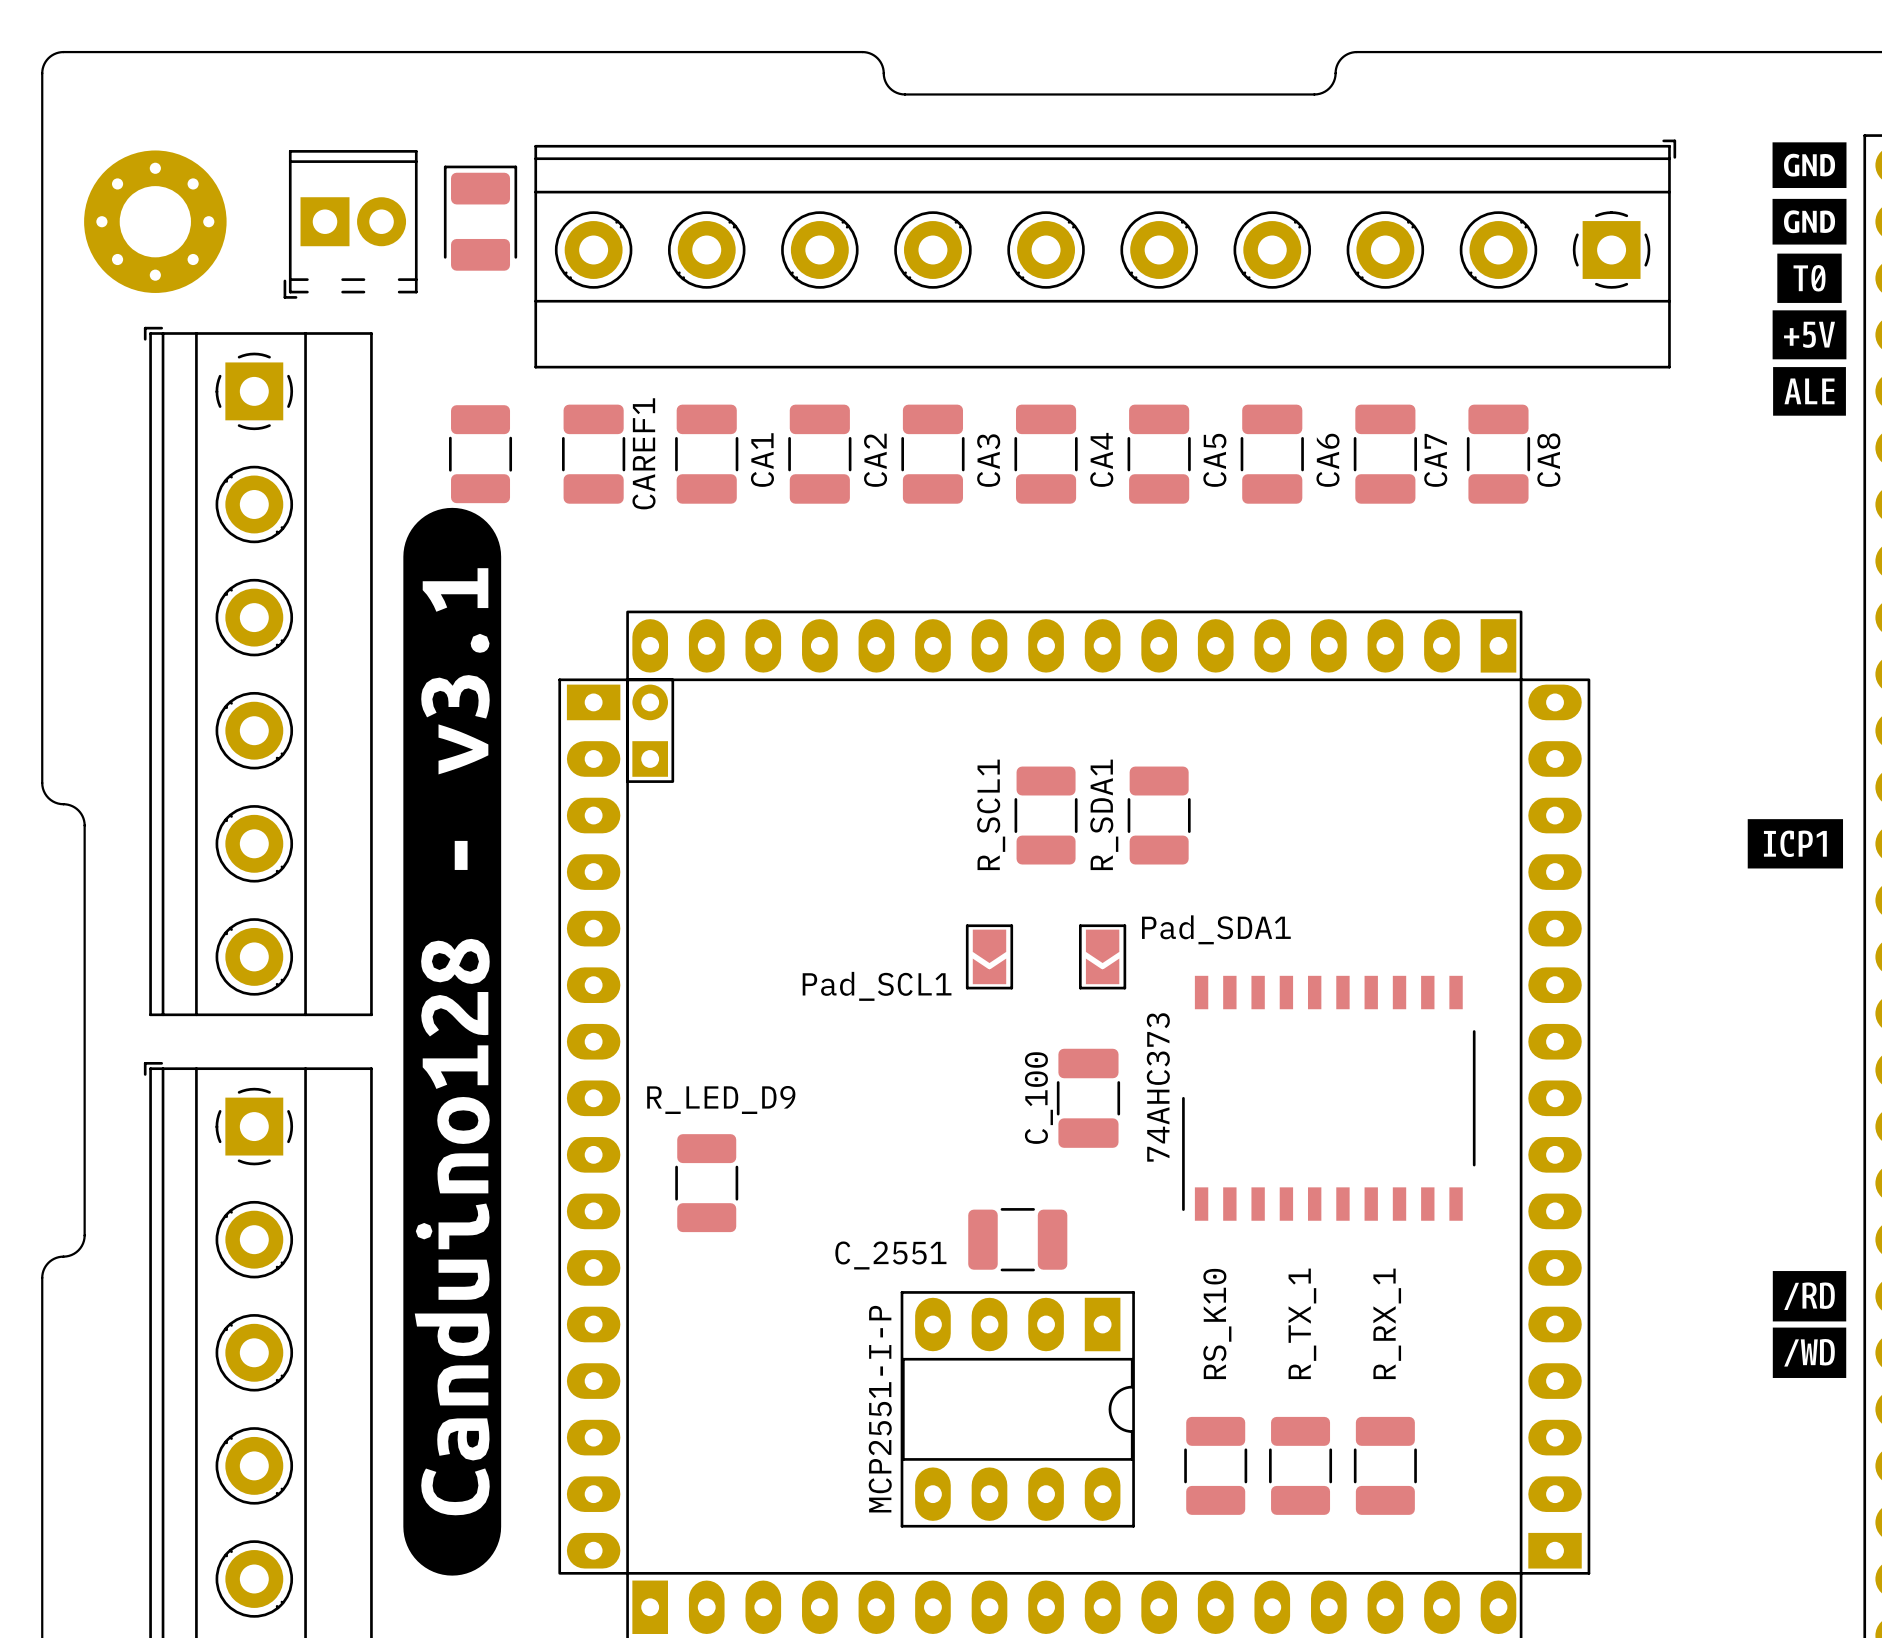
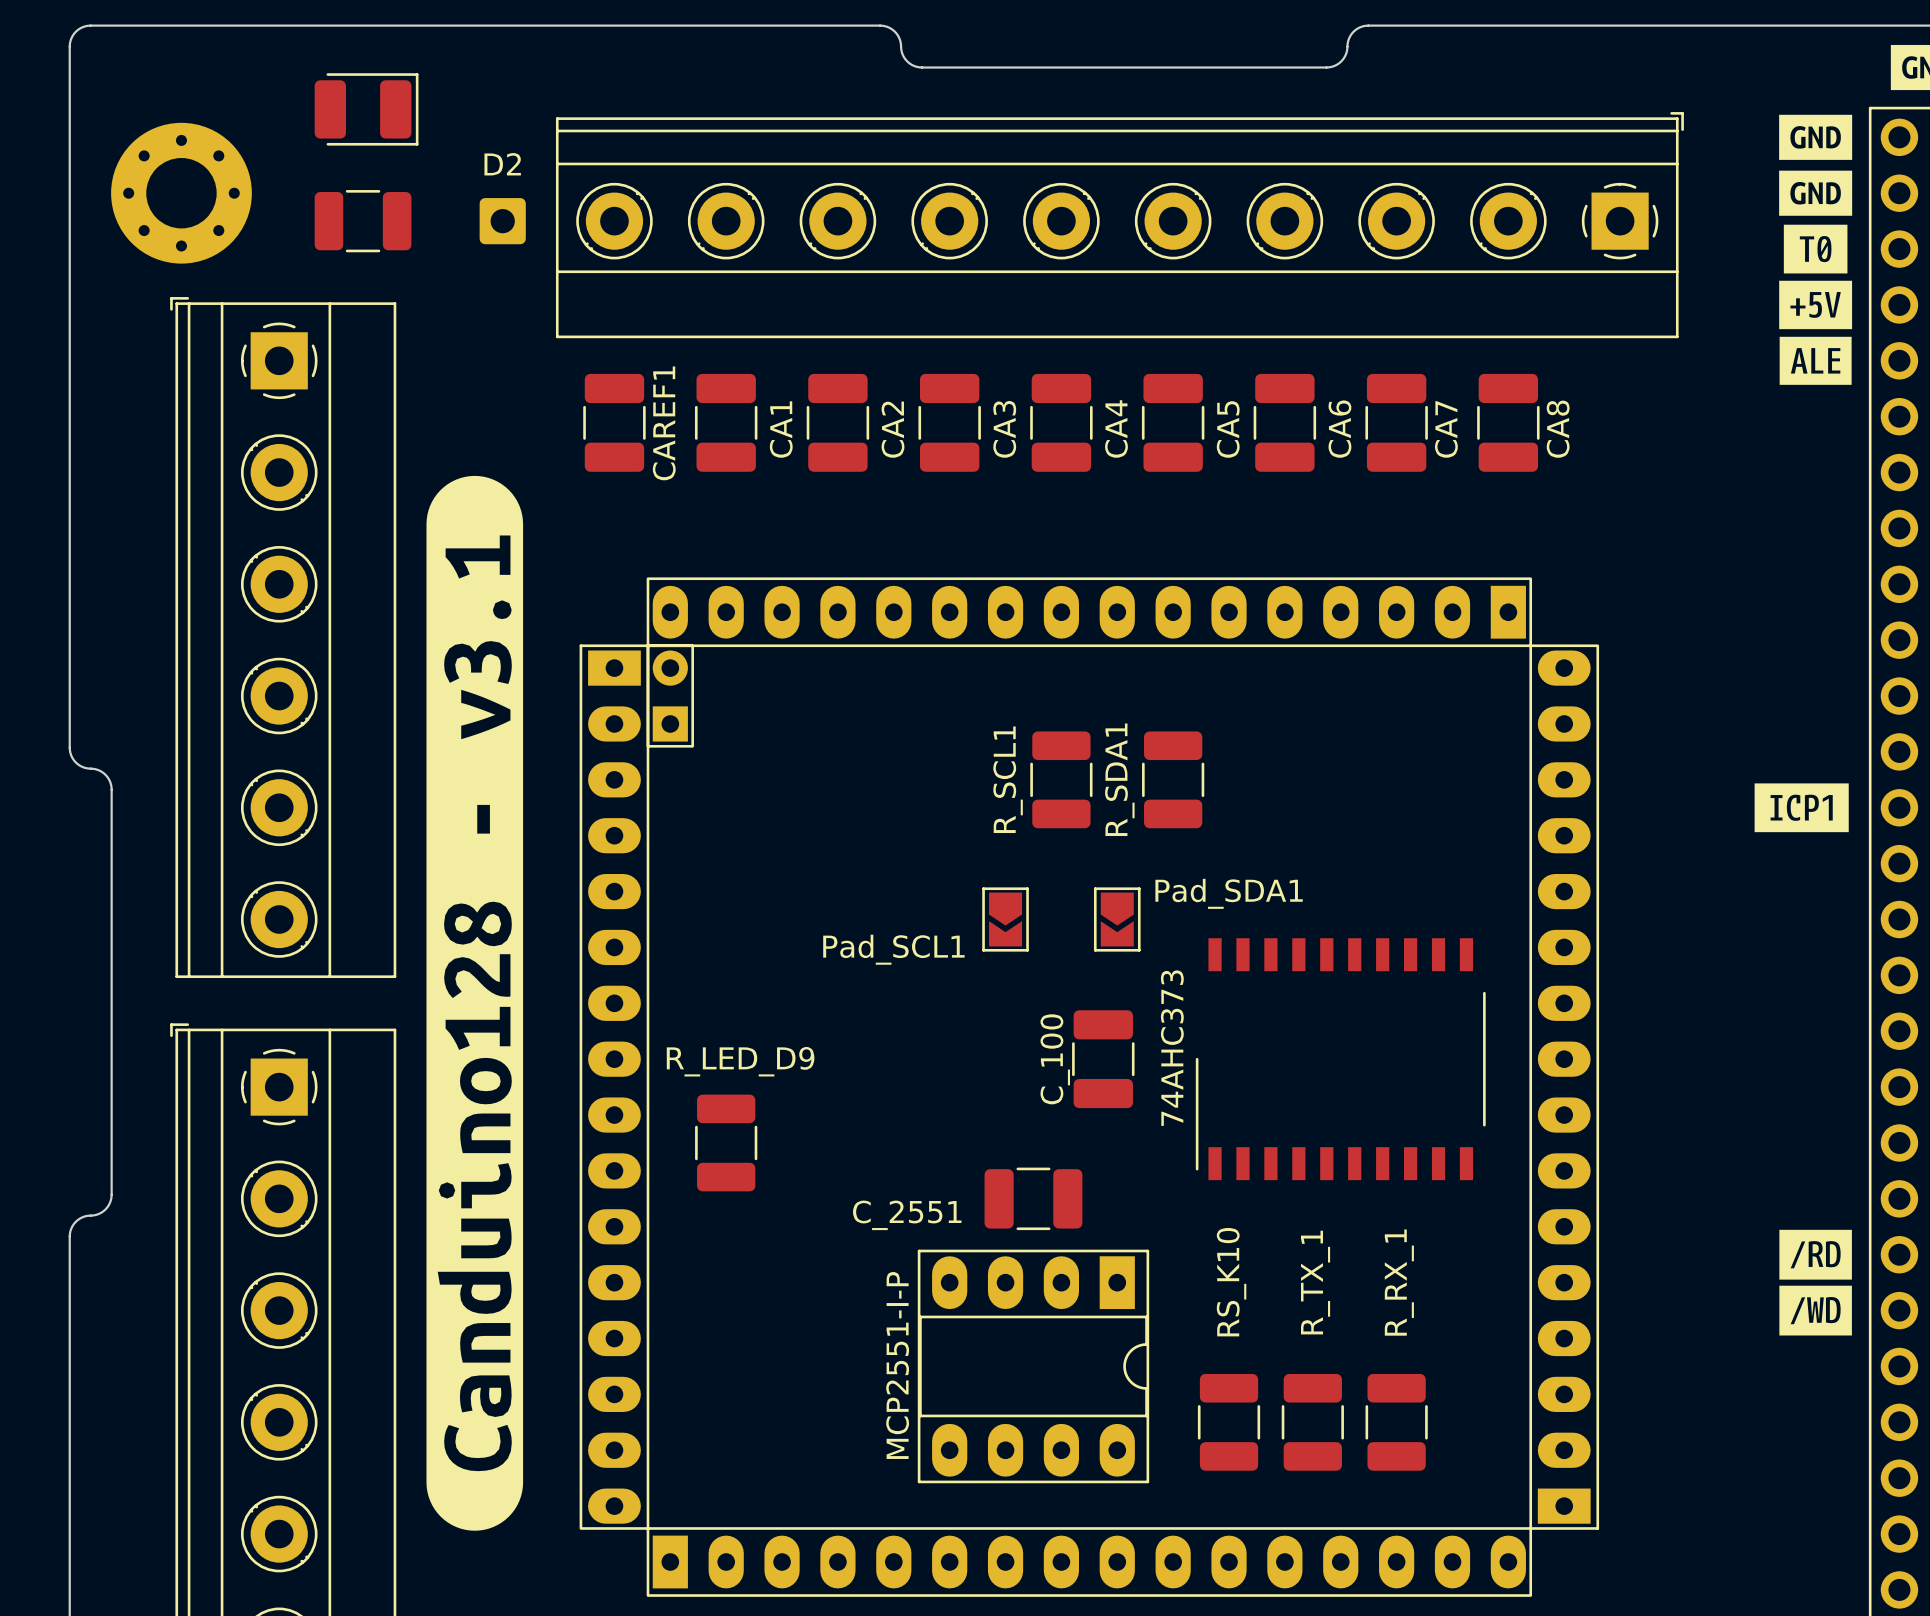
part rotation: 0° (480, 218) -> 90° clockwise (366, 109)
part position: (480, 218) -> (366, 109)
part: (350, 224) -> none
D2: none -> (502, 221)
part rotation: 0° (480, 454) -> 90° clockwise (363, 221)
part position: (480, 454) -> (363, 221)

